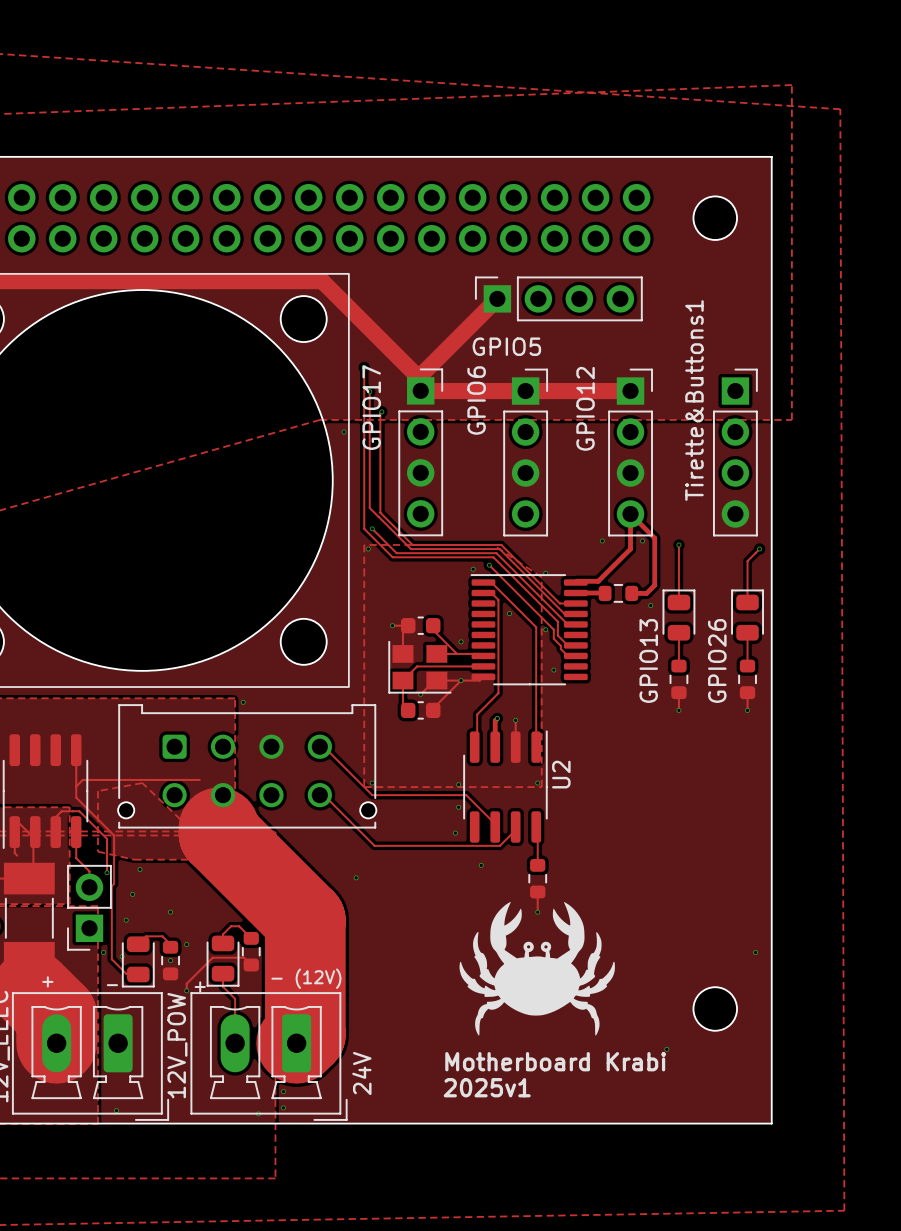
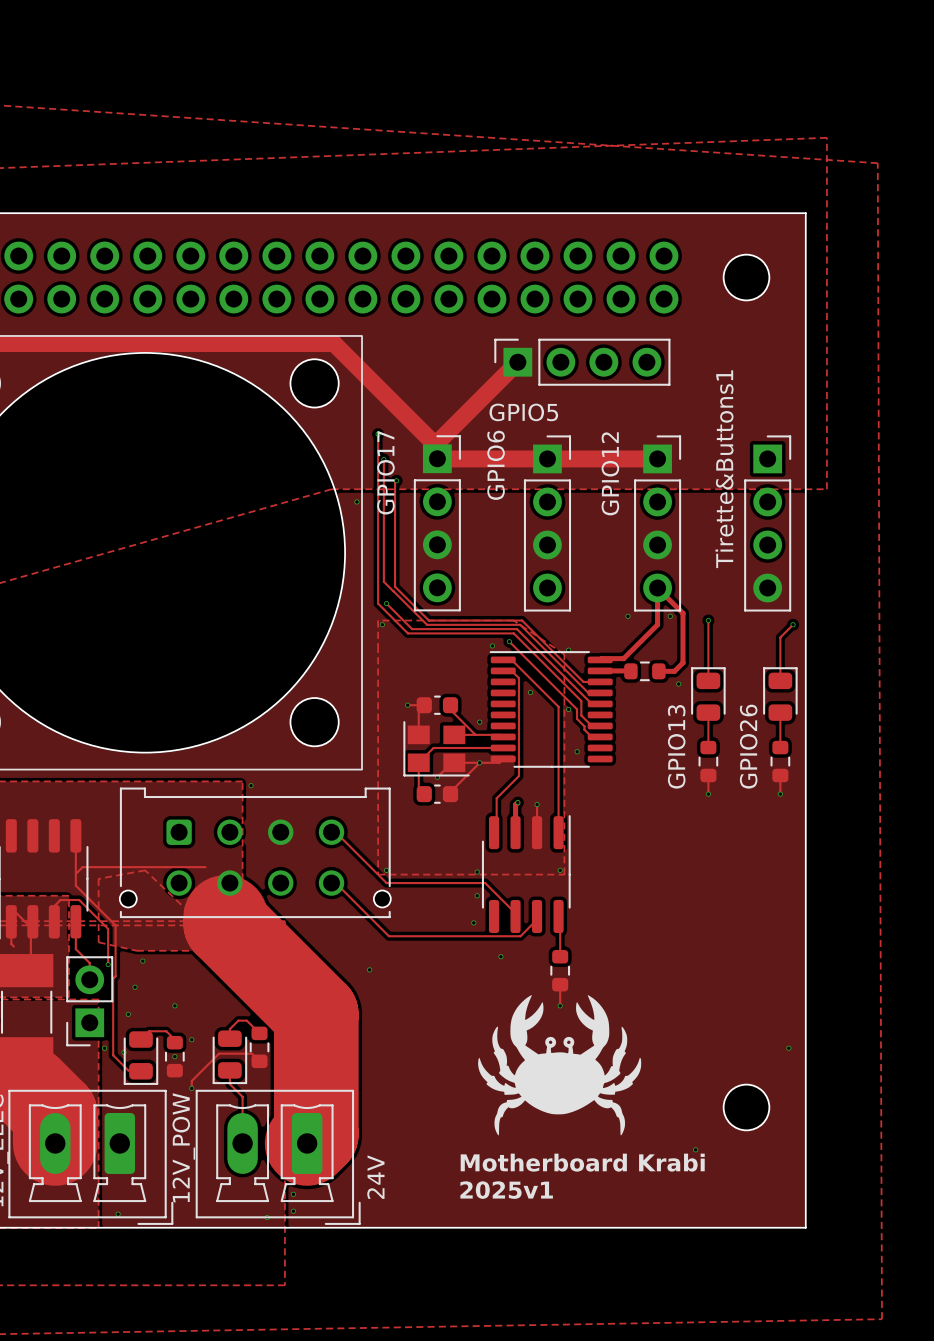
U2 name: U2 (561, 774) -> none
text: - (12V) (306, 978) -> none
text: + (47, 981) -> none
text: - (112, 985) -> none
text: + (200, 987) -> none

